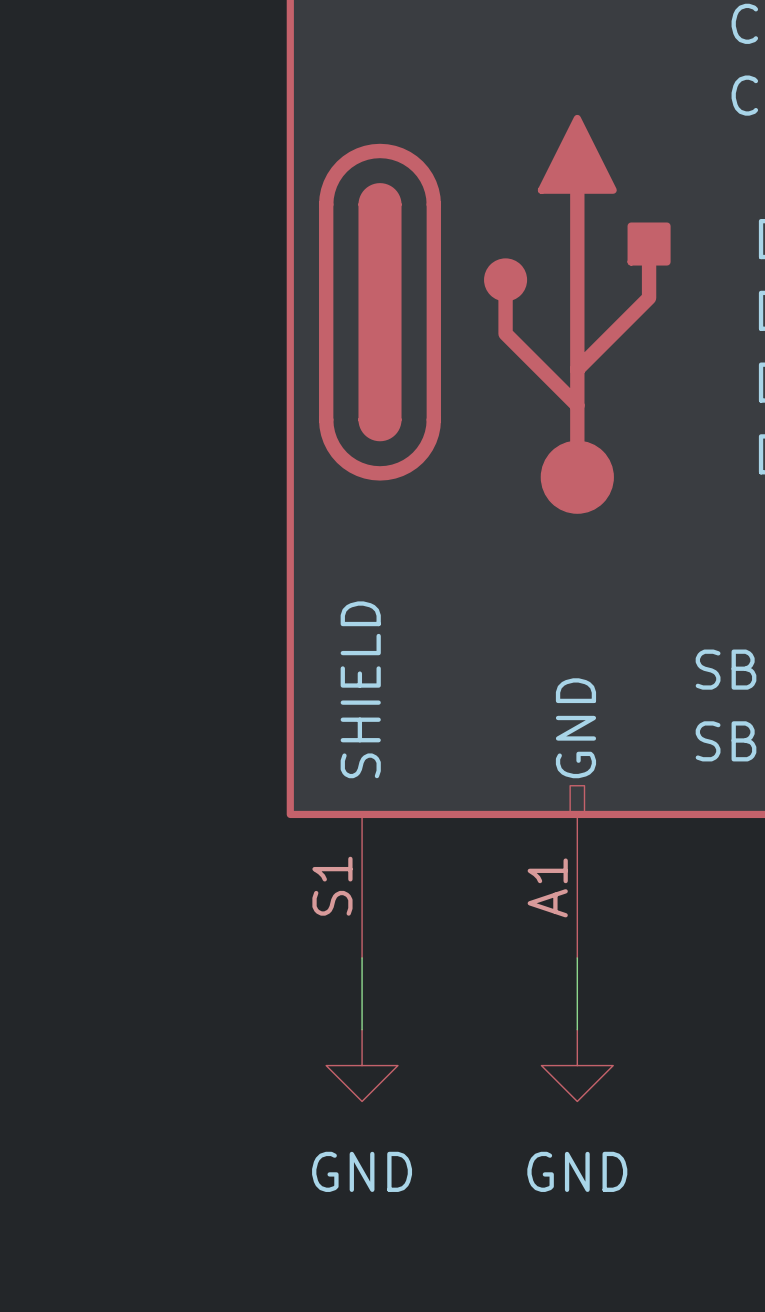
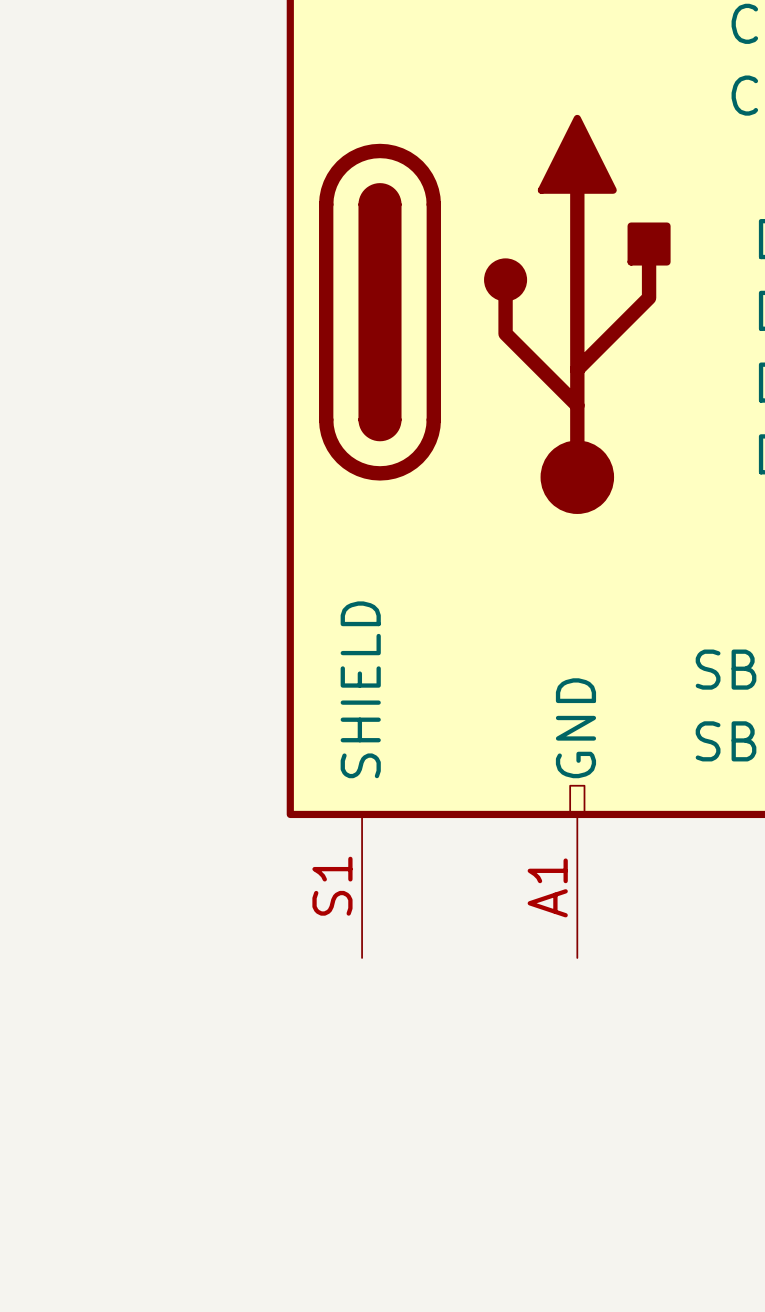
wire: (362, 957) (362, 1029) -> none
wire: (577, 957) (577, 1029) -> none
power symbol: GND (362, 1065) -> none
power symbol: GND (577, 1065) -> none

